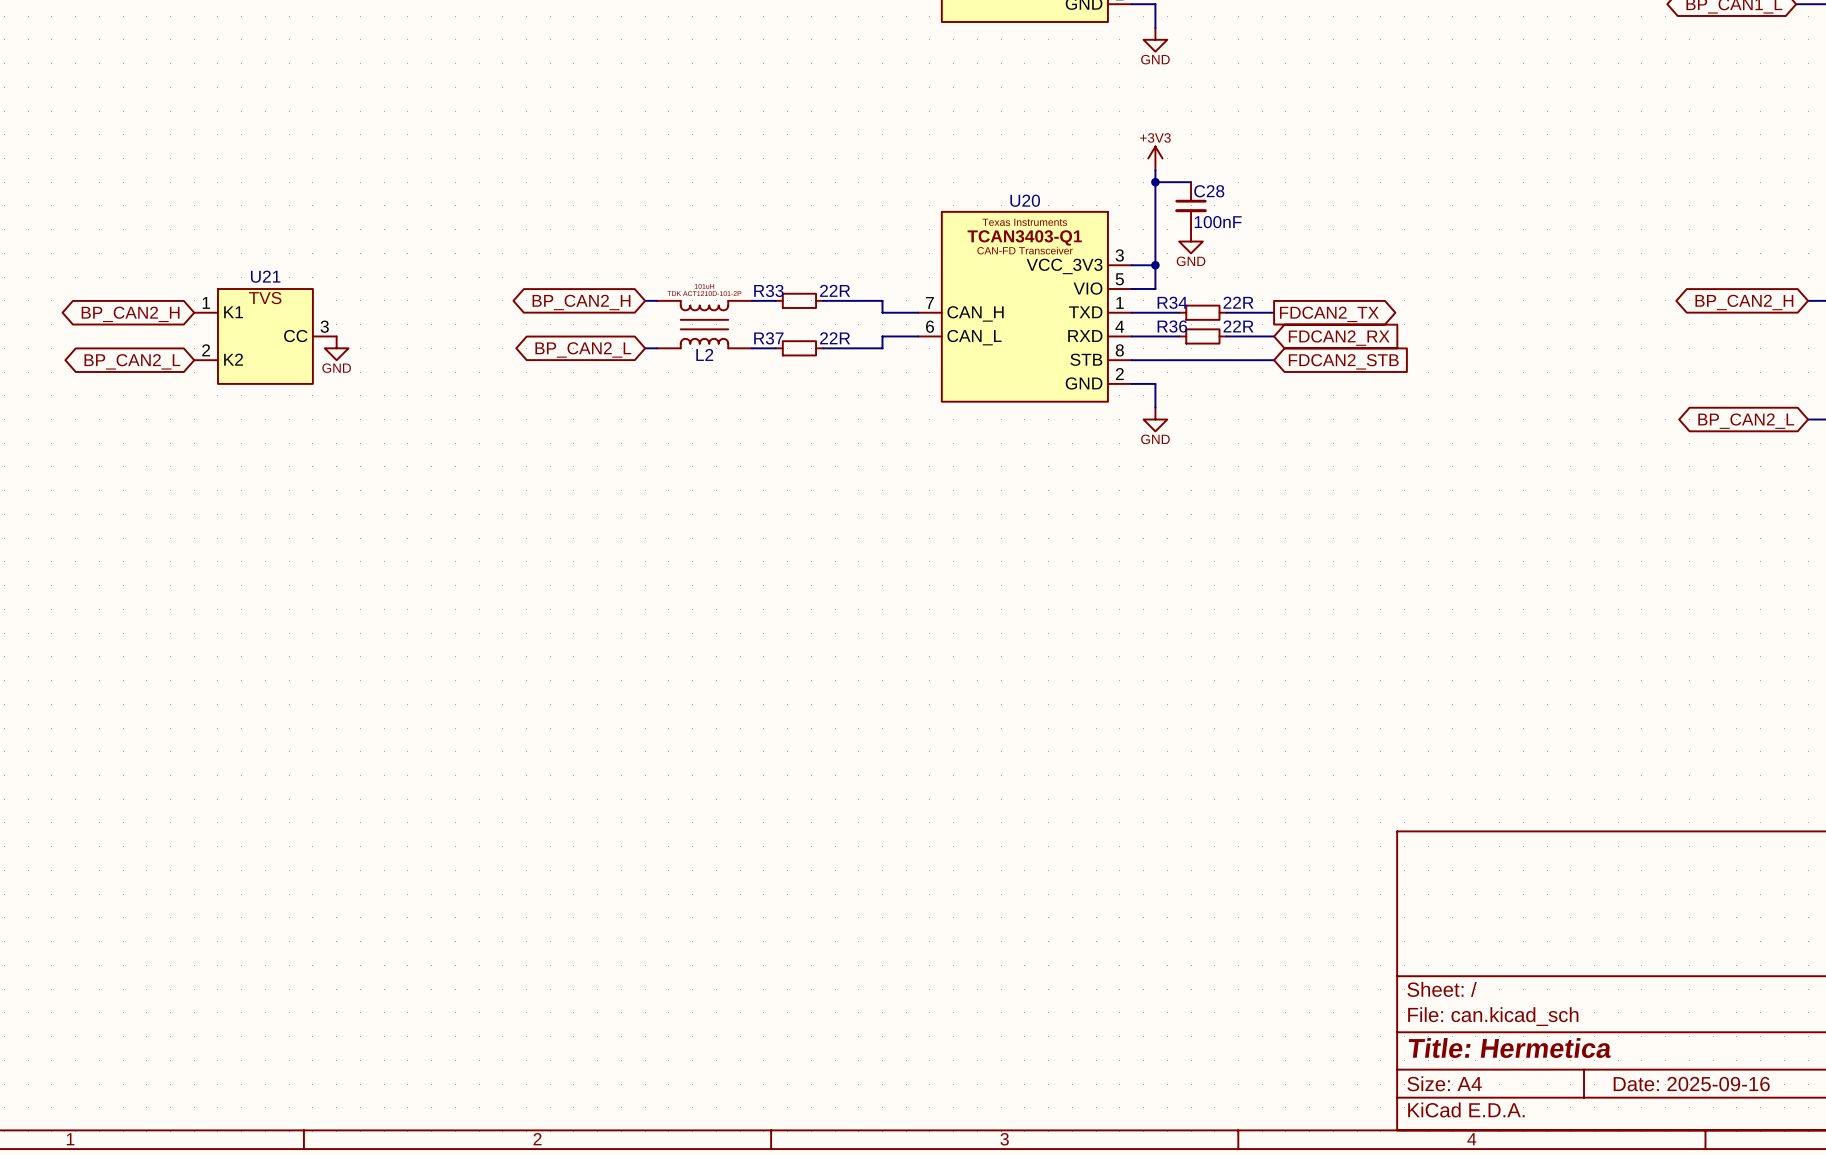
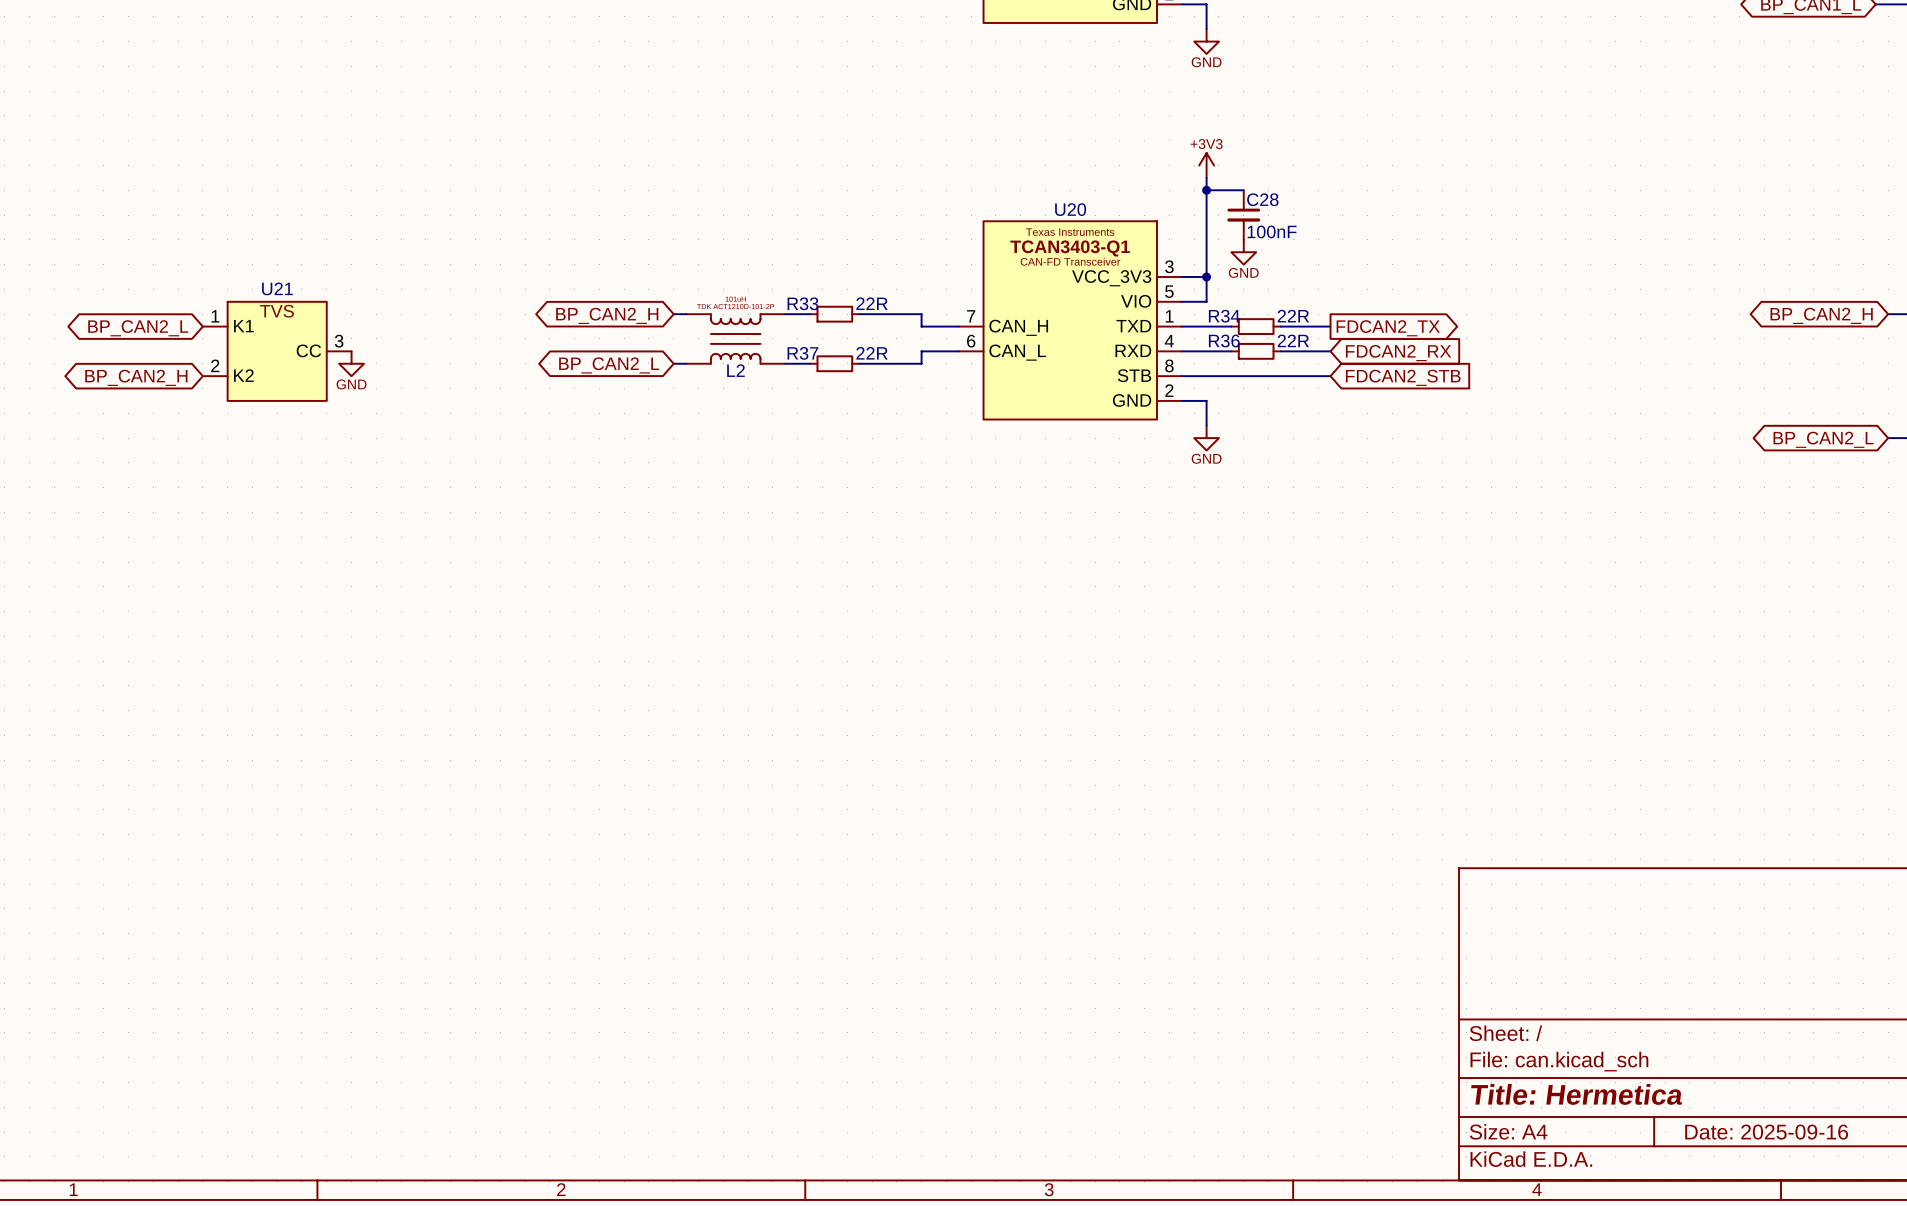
global label: BP_CAN2_H (130, 314) -> BP_CAN2_L (138, 328)
global label: BP_CAN2_L (132, 361) -> BP_CAN2_H (136, 377)

